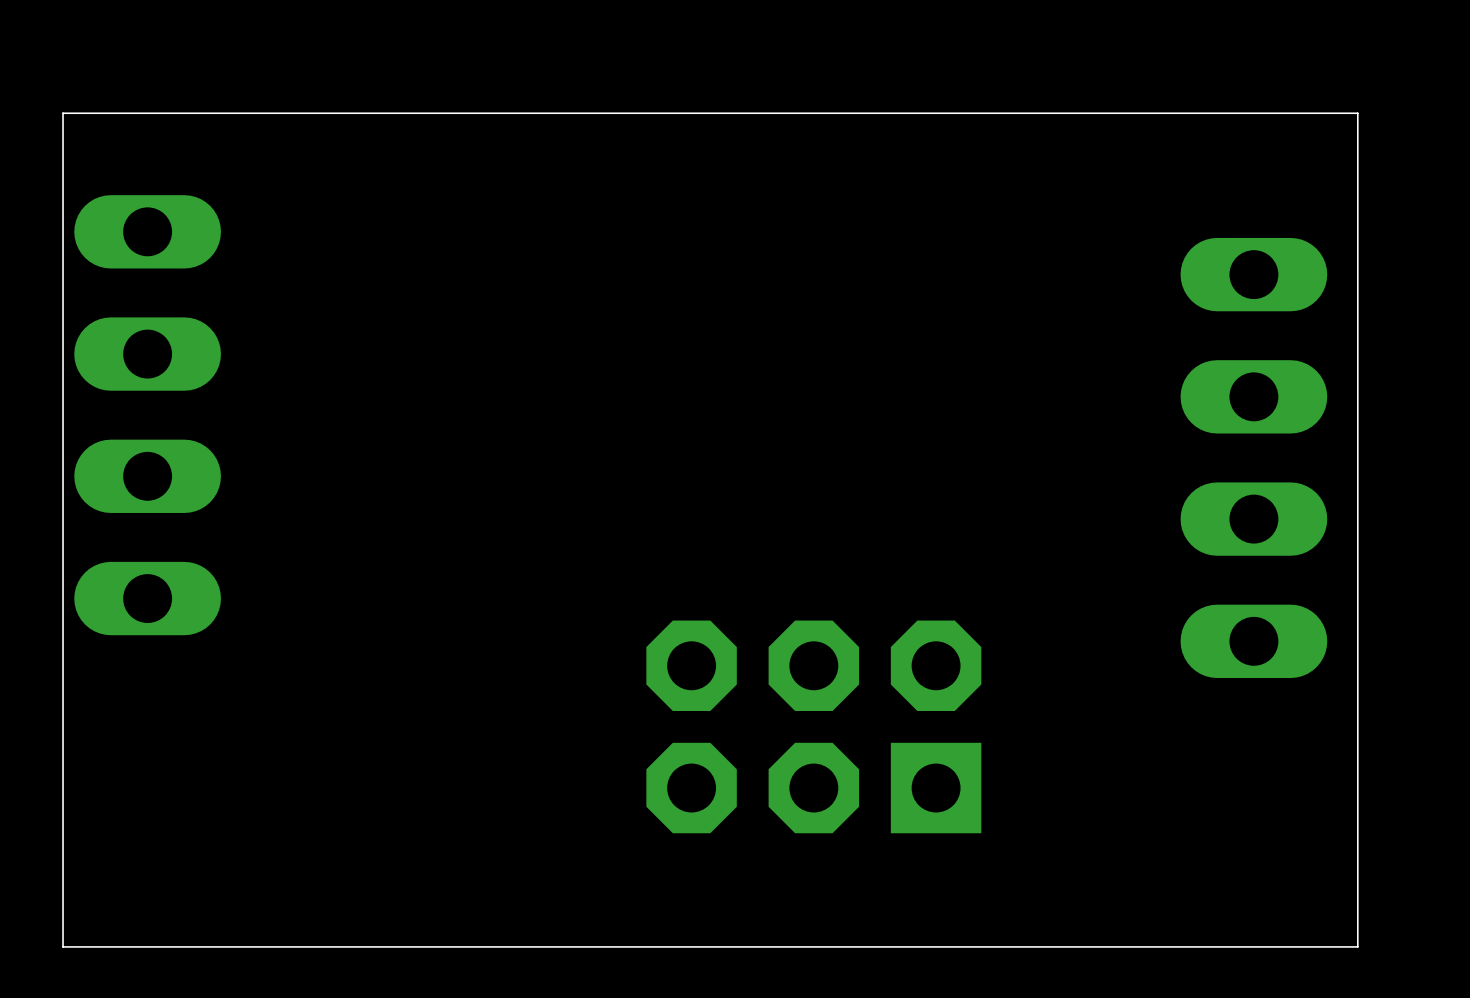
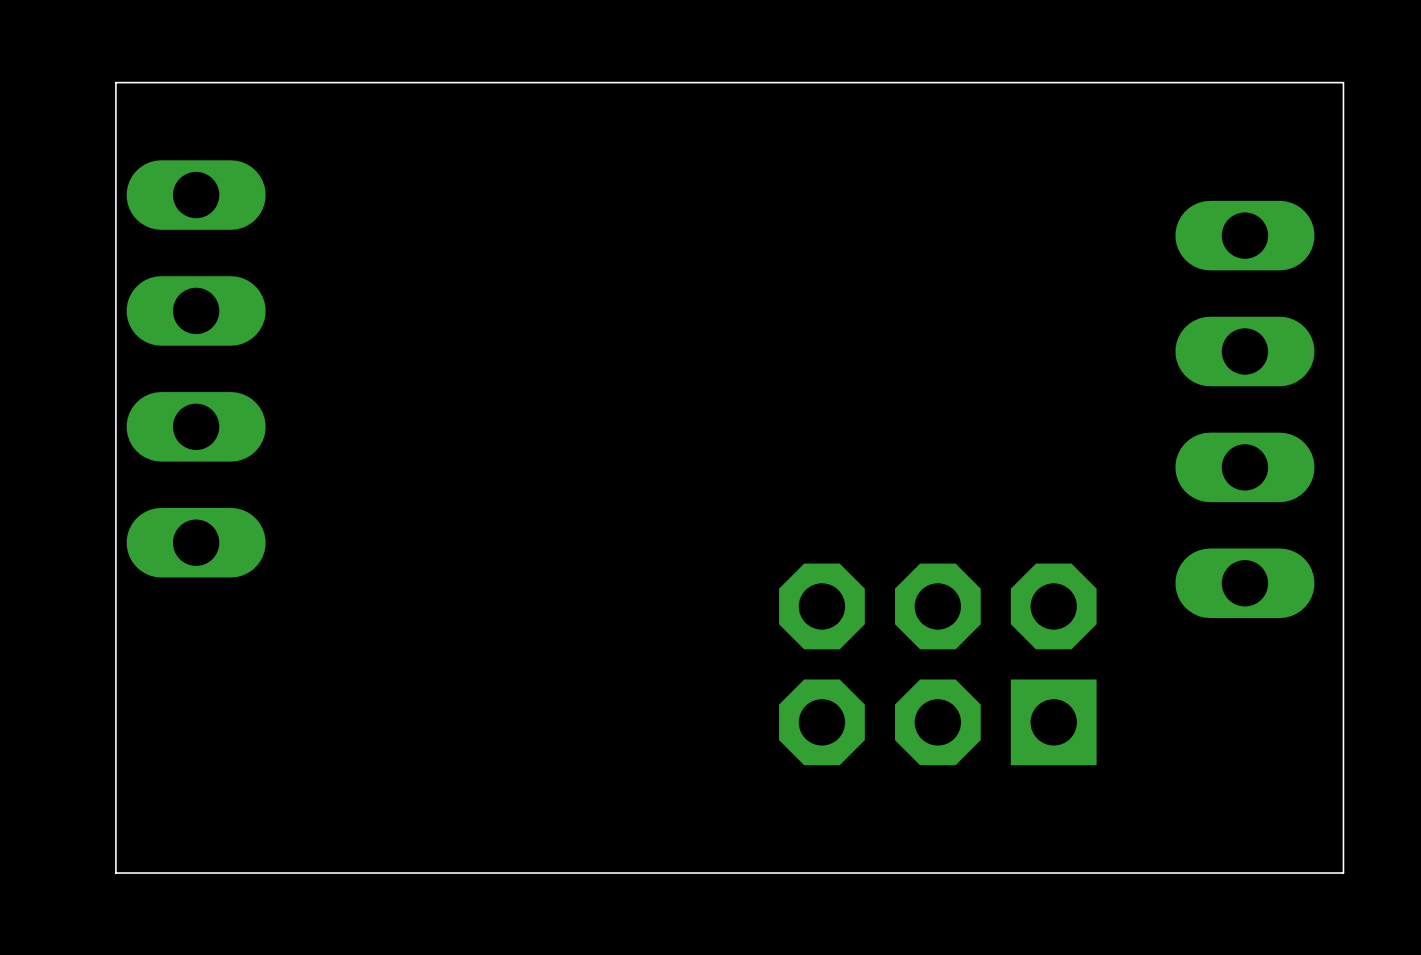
part position: (813, 726) -> (937, 664)

